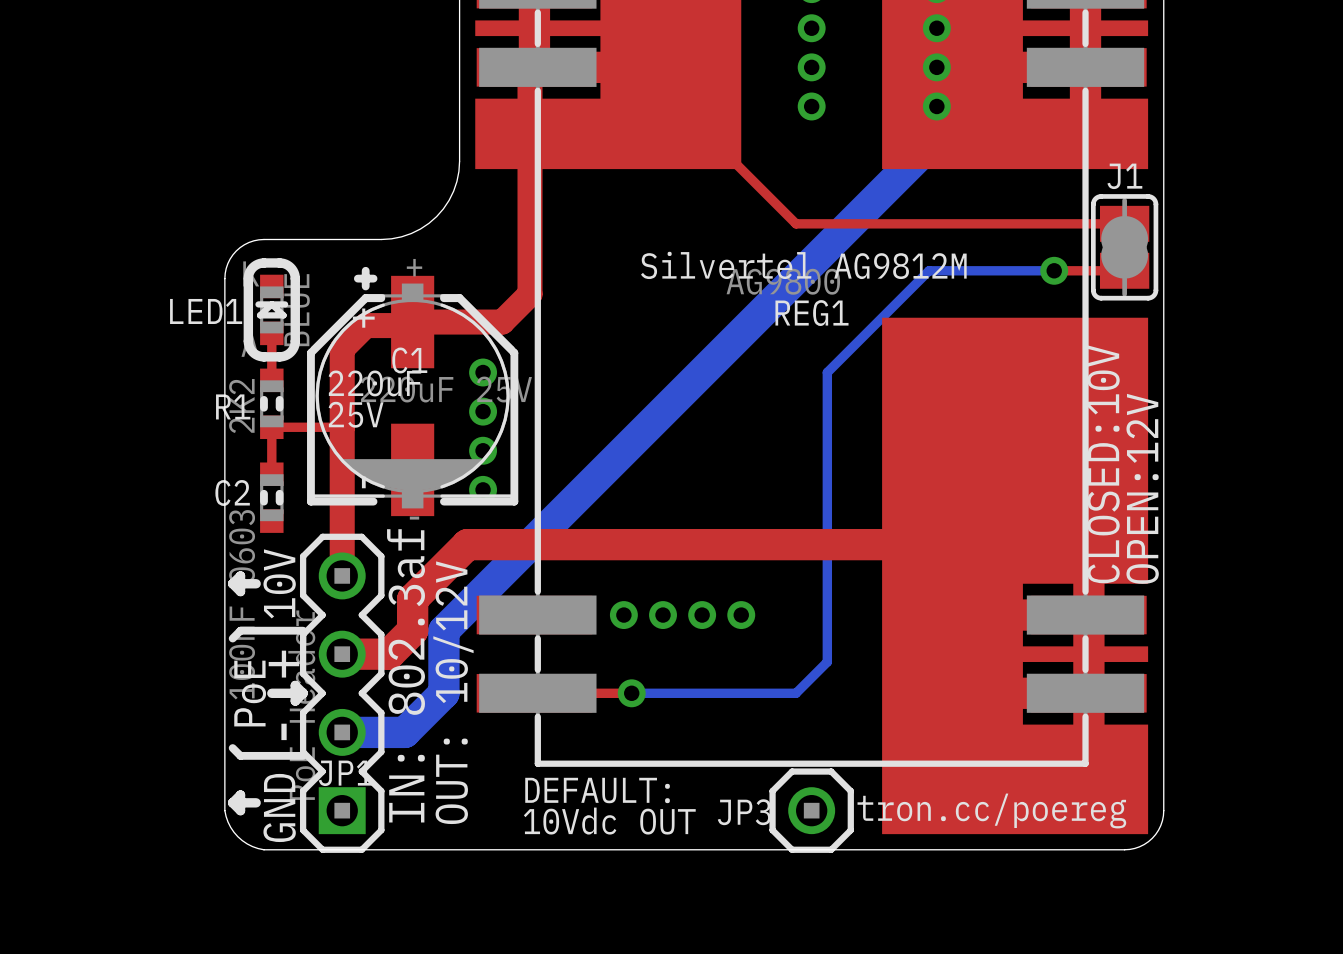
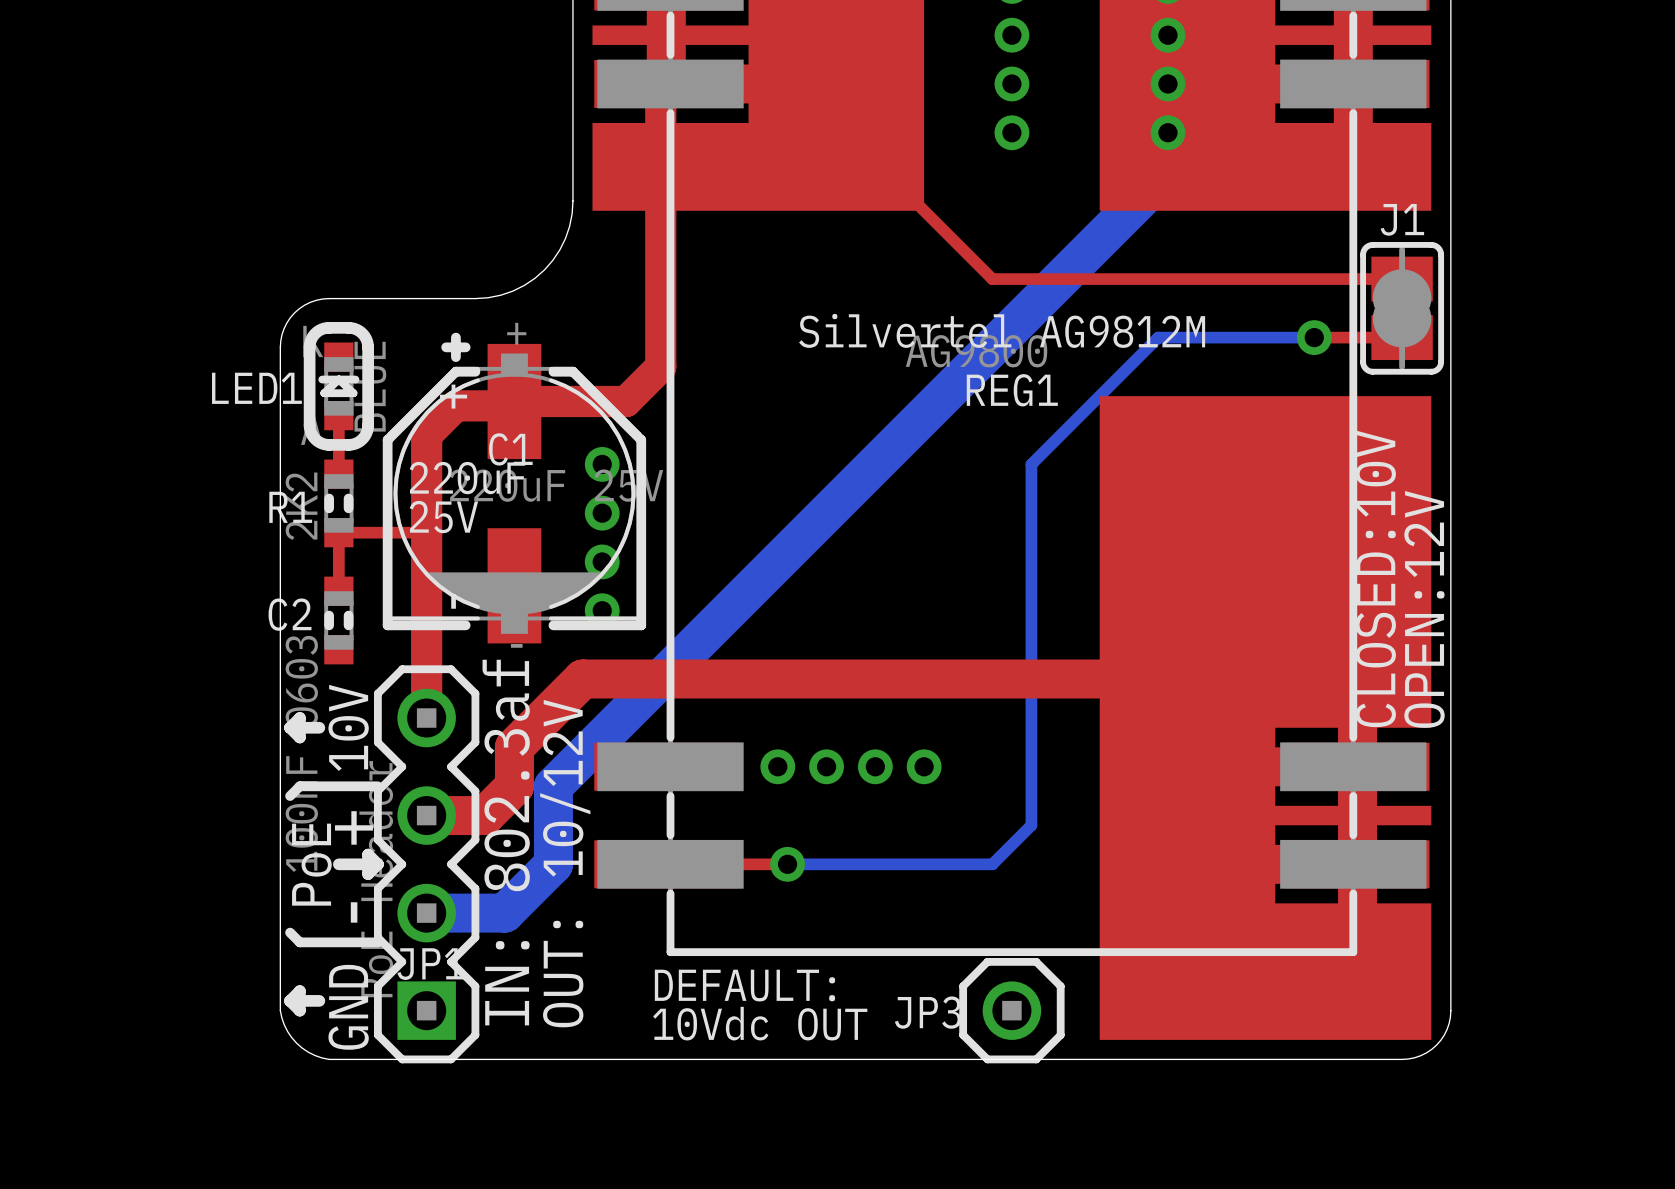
text: tron.cc/poereg (991, 811) -> none

